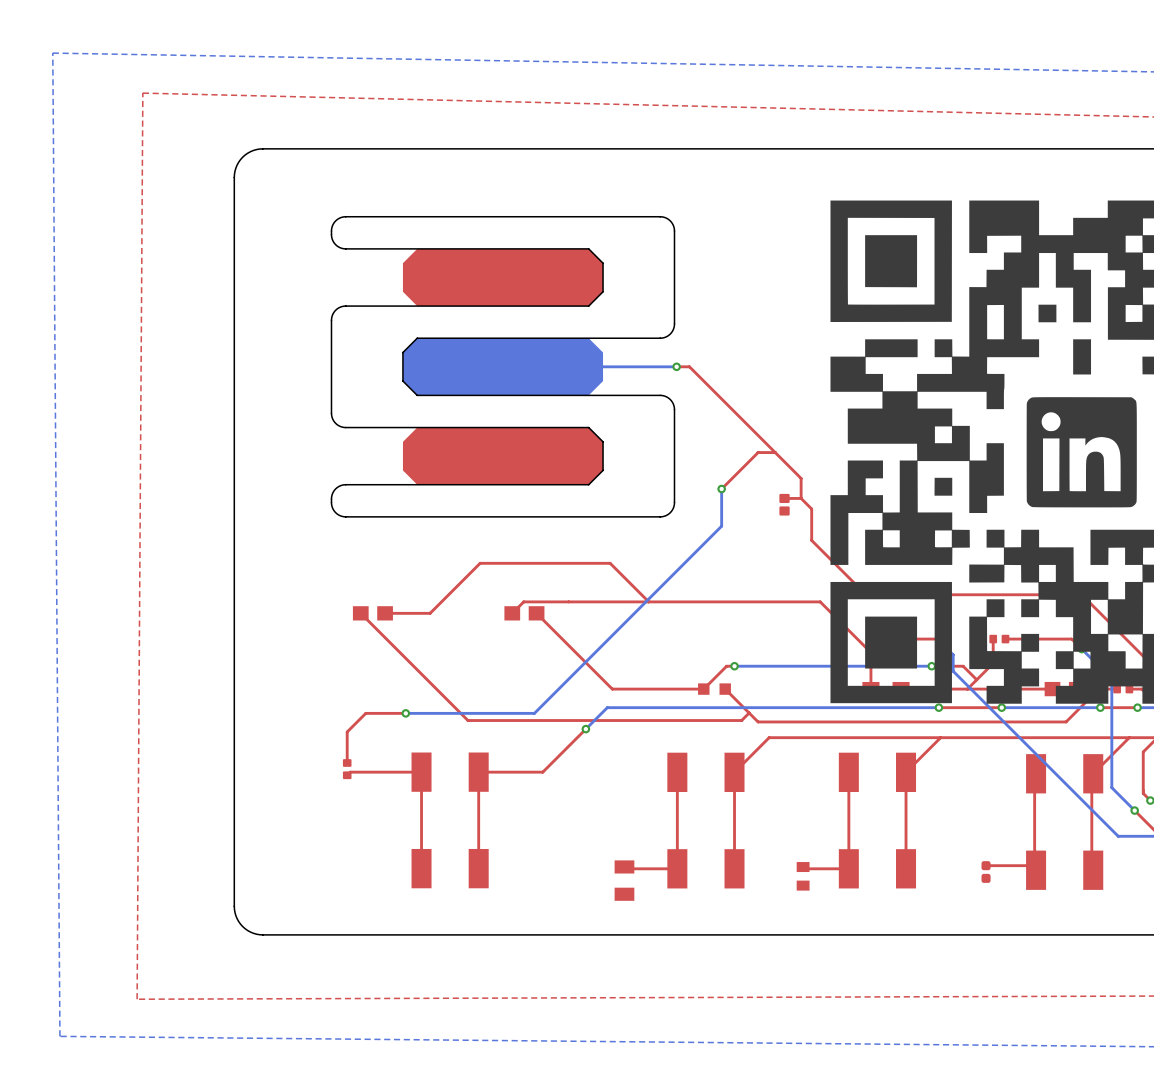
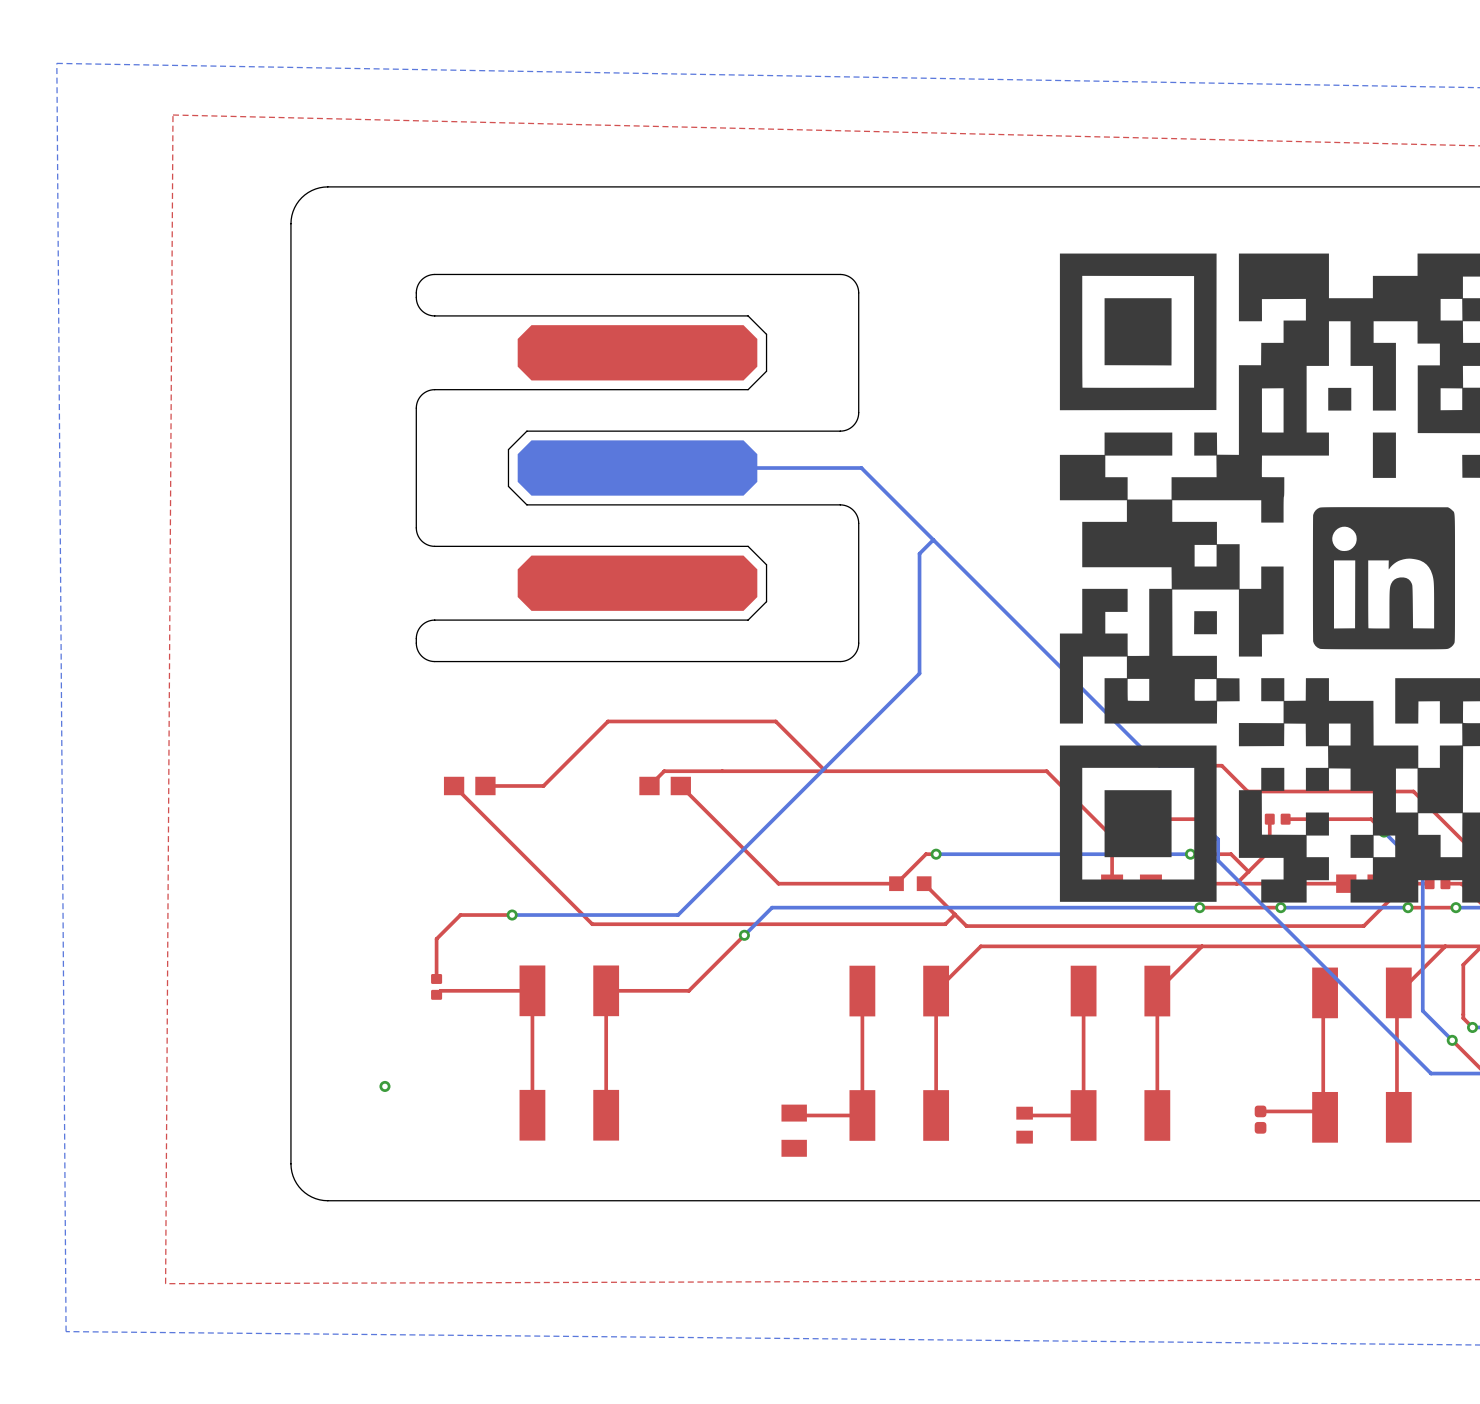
part footprint: [331, 216, 675, 518] -> [415, 274, 860, 663]
top track: (676, 366) (689, 366) (801, 478) (801, 498) -> none
bottom track: none -> (861, 468) (1159, 765) (1201, 765)
via: (676, 366) -> none
bottom track: none -> (933, 539) (919, 553) (919, 625)
top track: (775, 452) (758, 452) (721, 489) -> none
via: (721, 489) -> none
top track: (801, 498) (811, 509) (811, 540) (866, 594) (1081, 594) (1104, 617) -> (1201, 765) (1221, 765) (1247, 791) (1413, 791)
top track: (801, 498) (784, 498) -> none
part: (784, 504) -> none
via: none -> (384, 1086)

